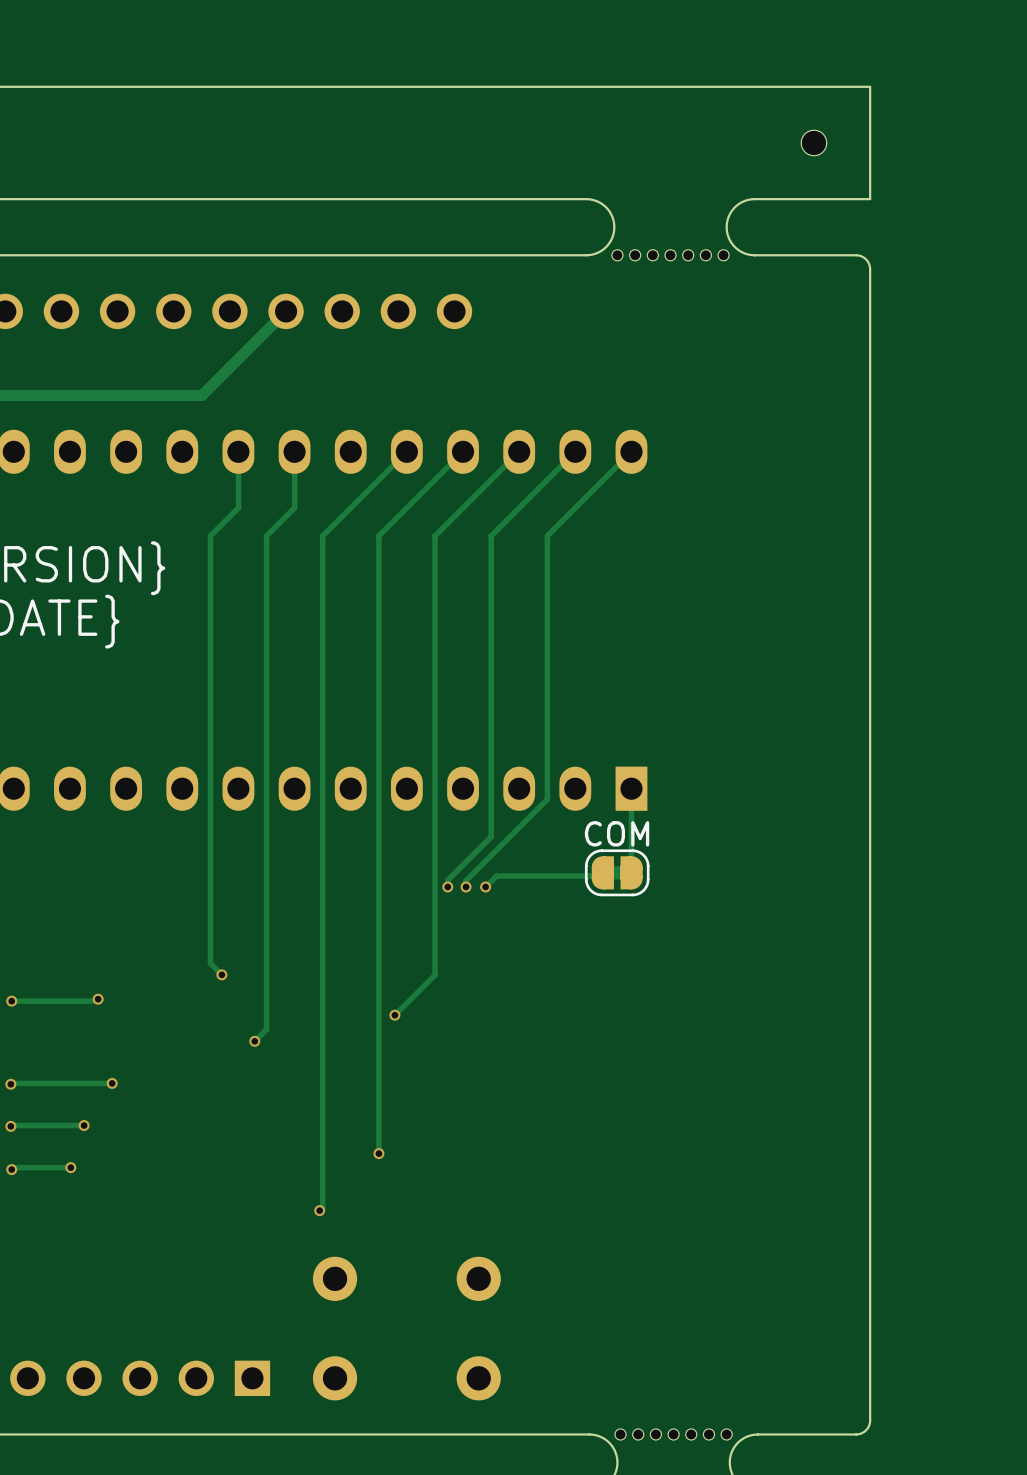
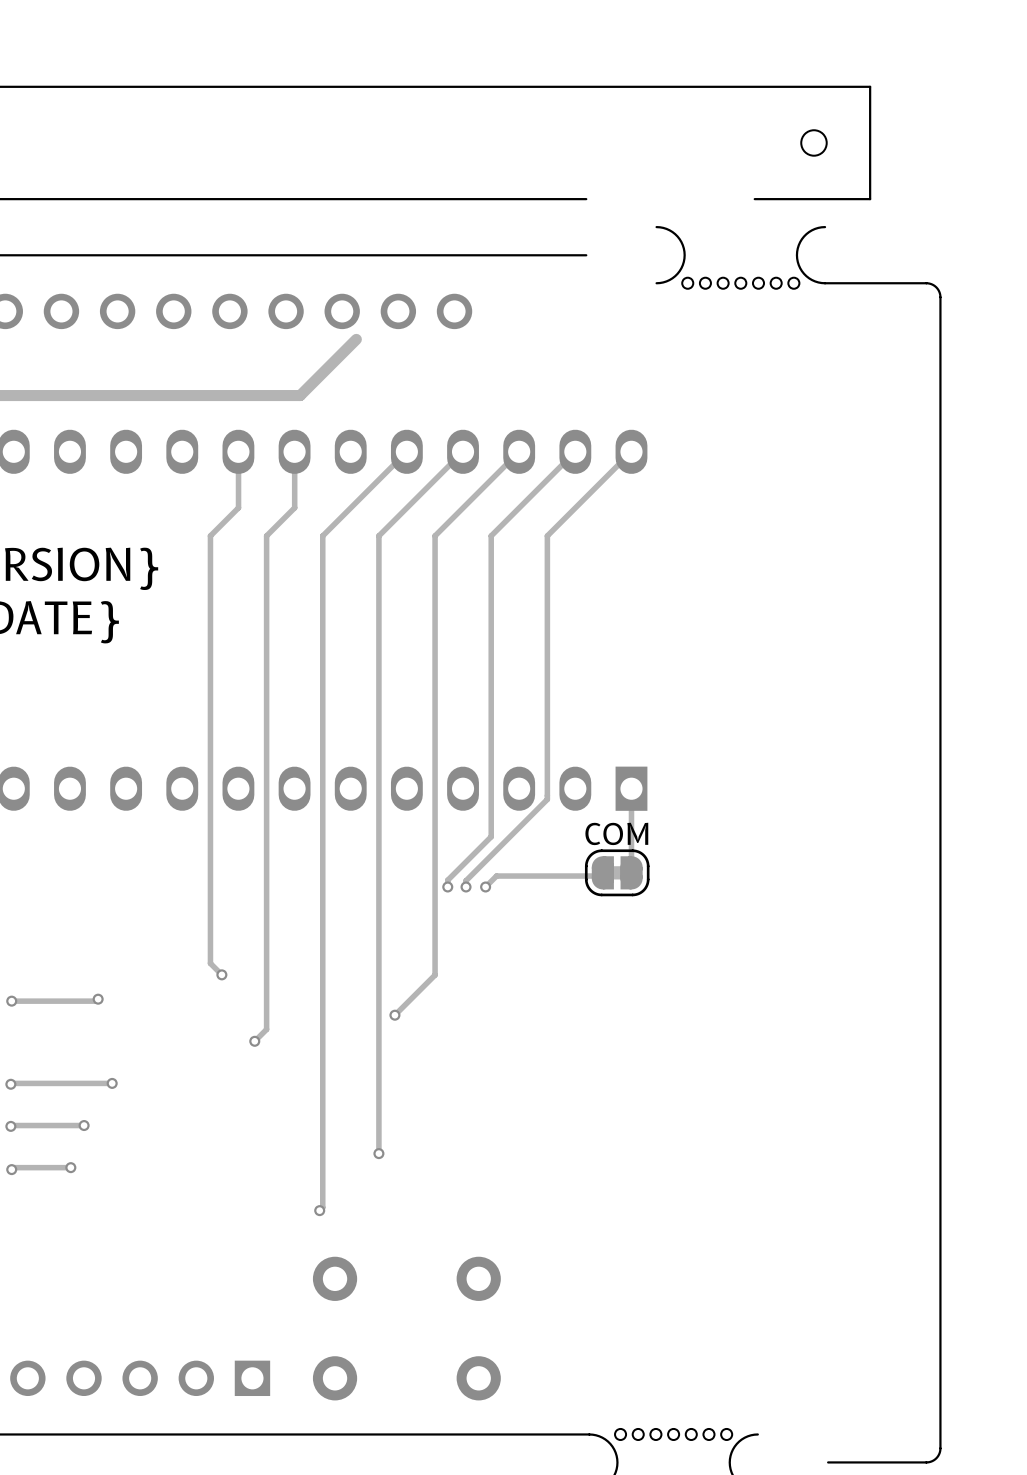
part position: (670, 229) -> (740, 257)
board edge: (754, 255) (857, 255) (867, 260) (870, 269) (870, 1422) (866, 1430) (857, 1434) (757, 1434) -> (825, 283) (927, 283) (937, 288) (940, 297) (940, 1449) (936, 1458) (927, 1462) (828, 1462)
track: (286, 311) (201, 395) -> (356, 339) (300, 395) (201, 395)

